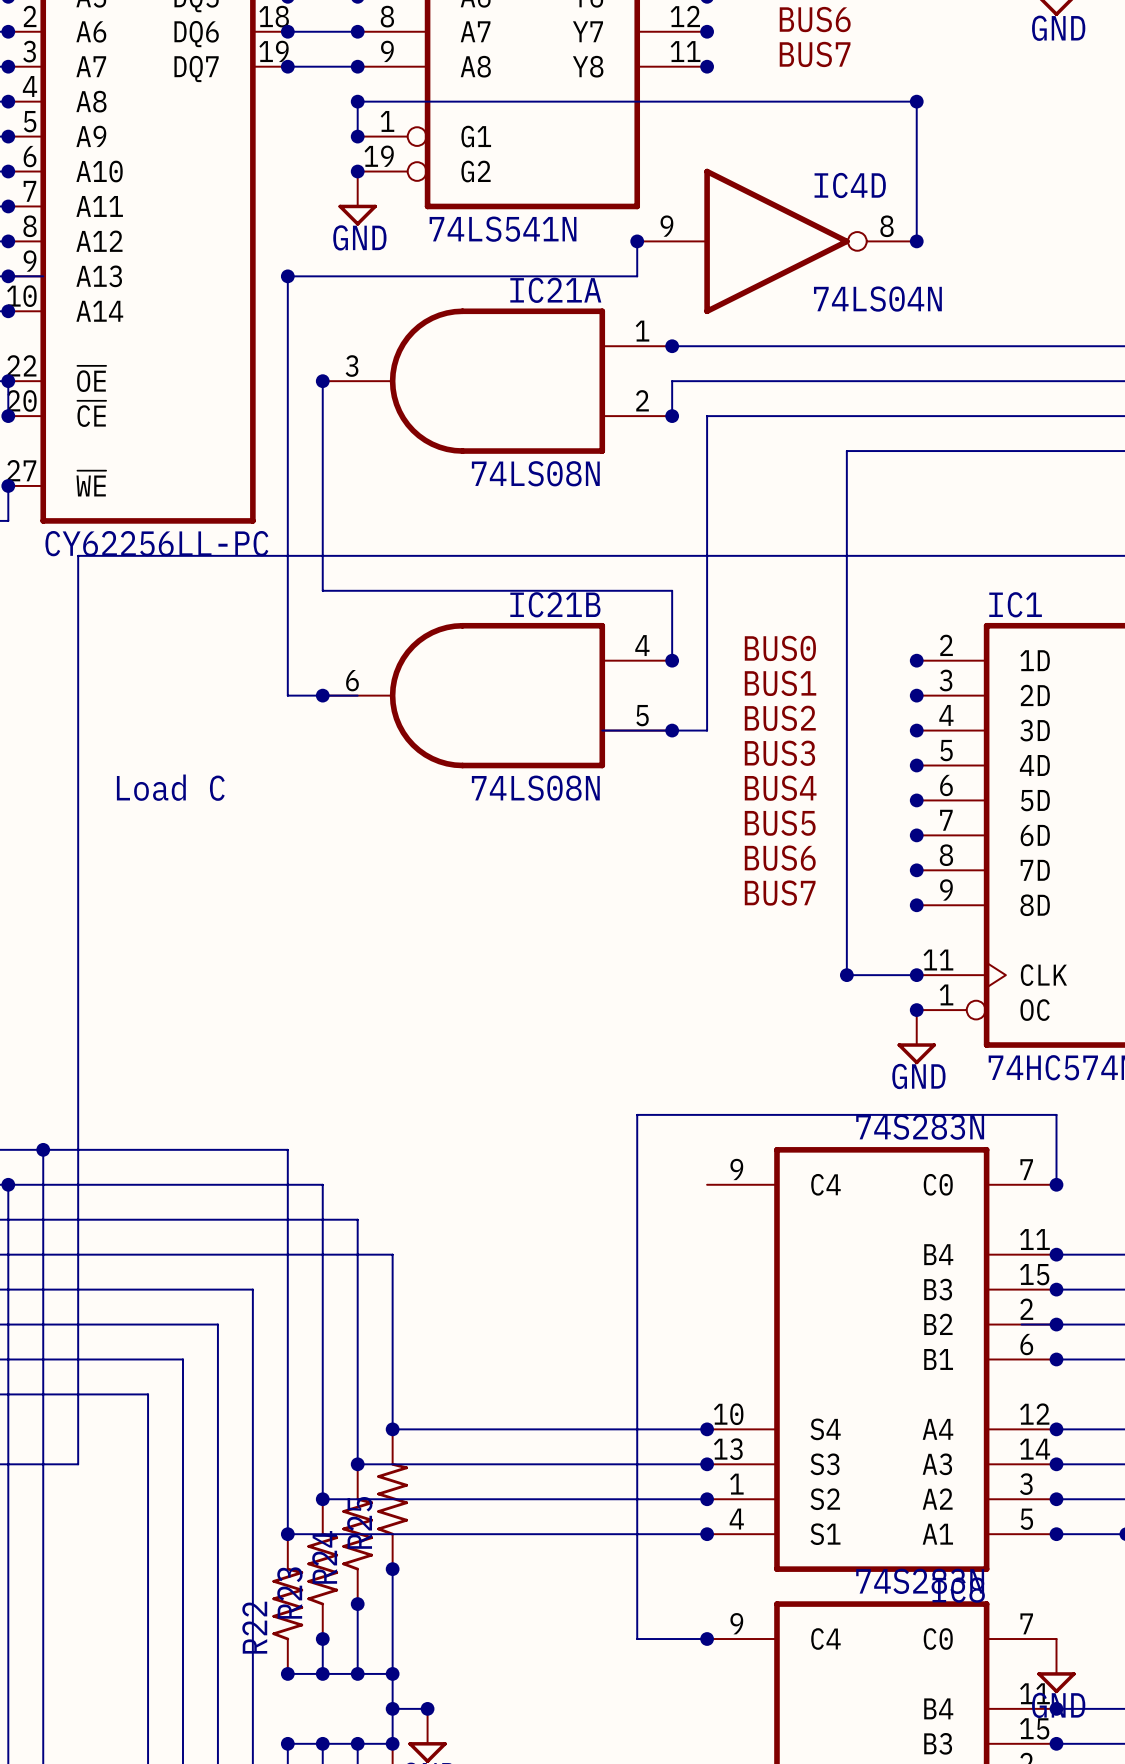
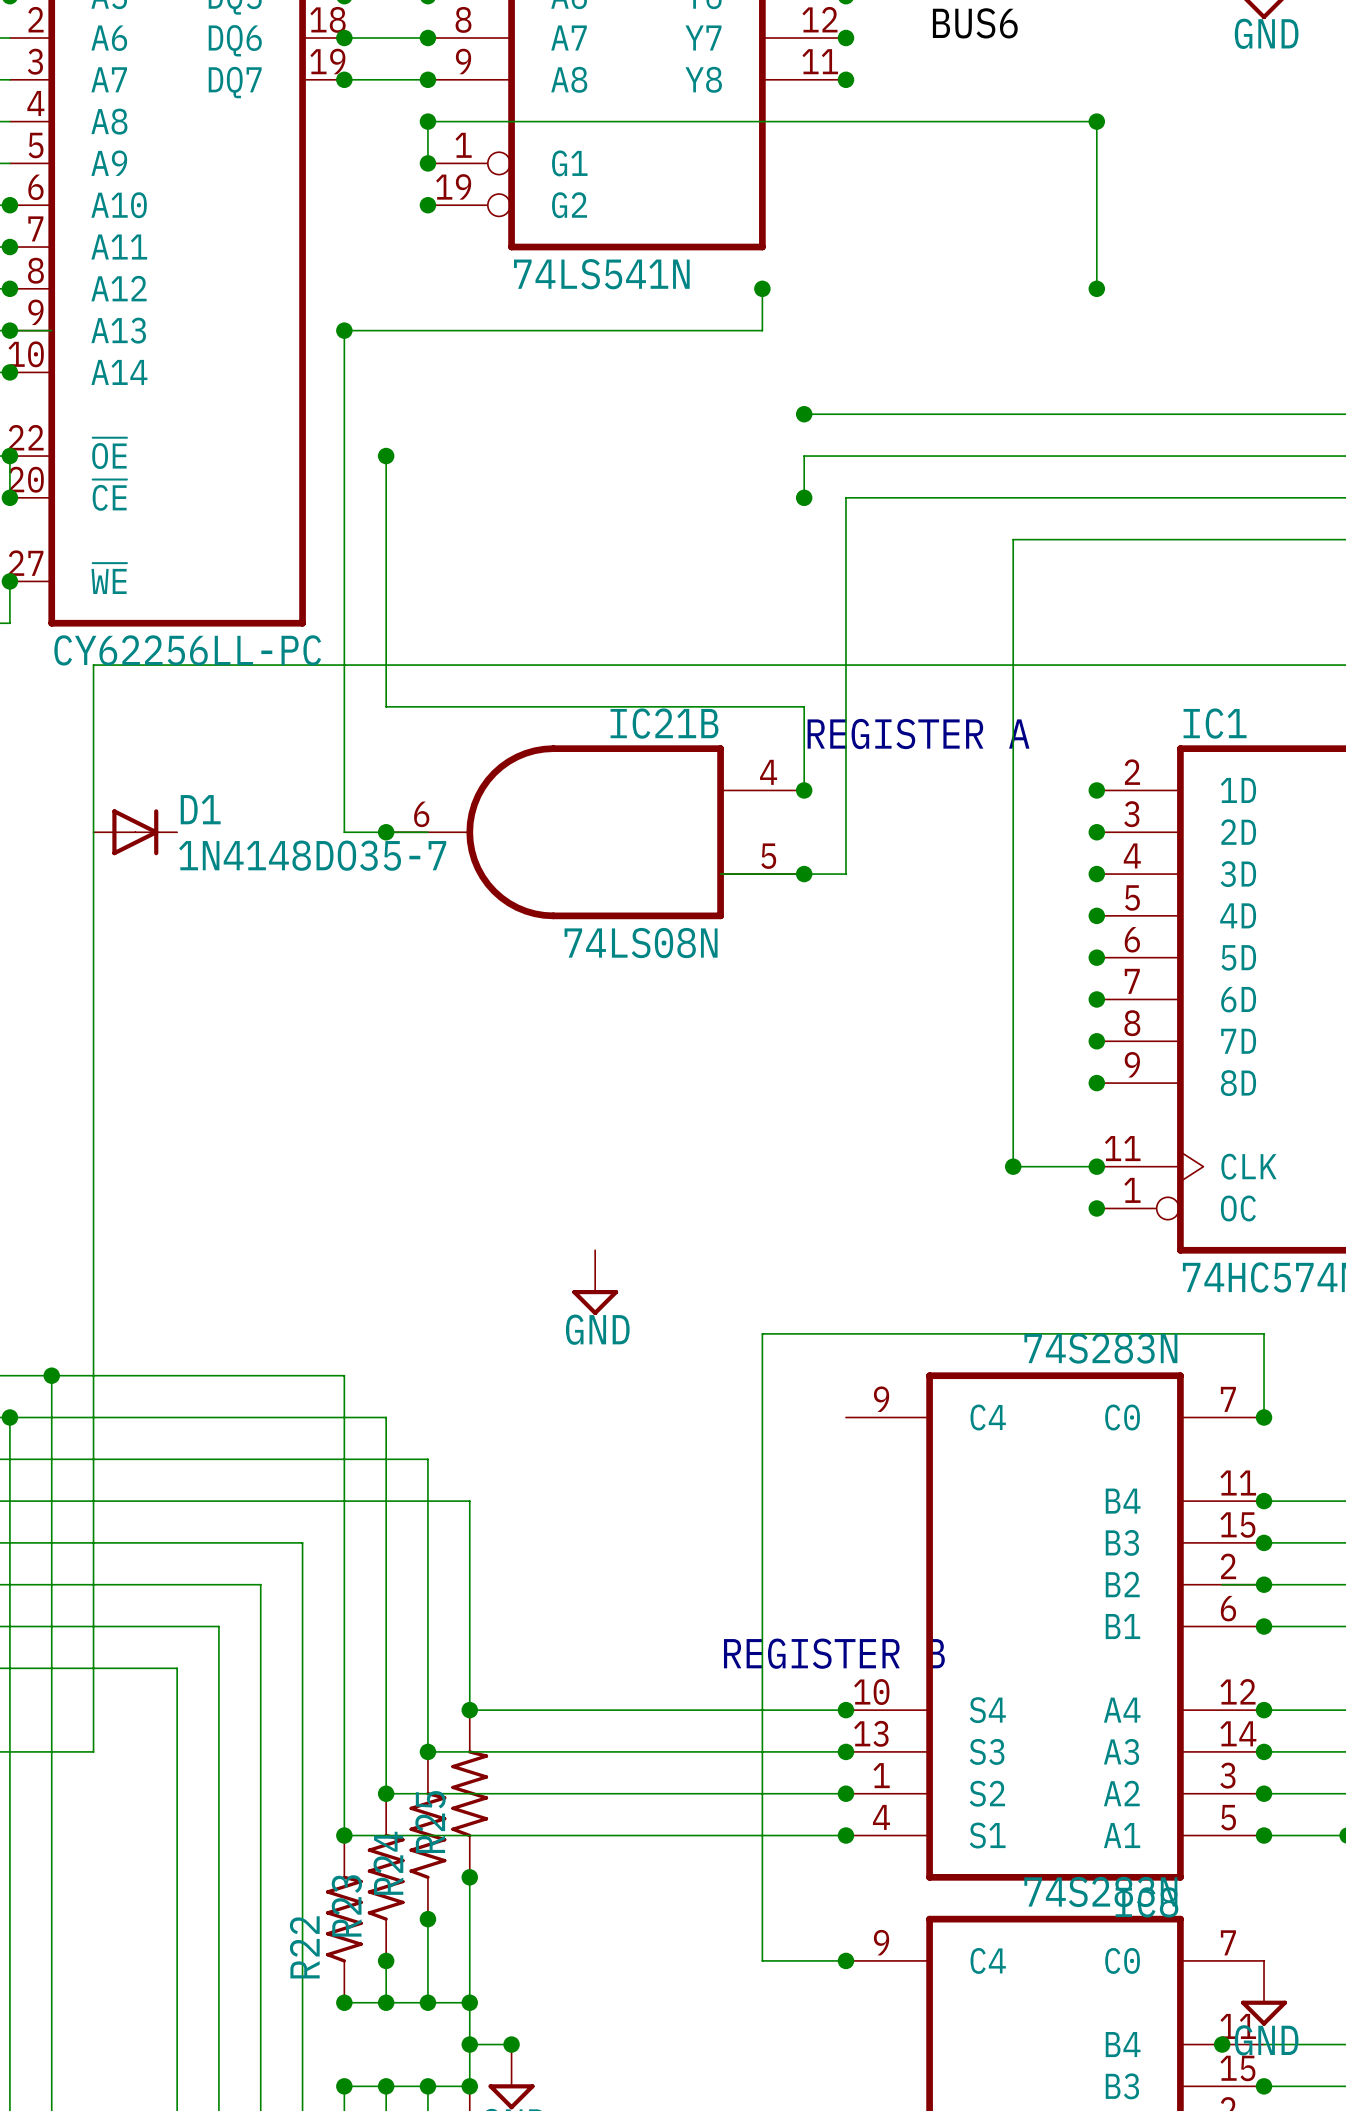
junction: (8, 31) -> none
label: BUS7 (815, 54) -> none
junction: (8, 66) -> none
junction: (8, 101) -> none
junction: (8, 136) -> none
power symbol: GND (357, 198) -> none
IC4D: 74LS04N (776, 241) -> none
IC21A: 74LS08N (497, 381) -> none
text: none -> REGISTER A (918, 734)
label: BUS0 (780, 648) -> none
label: BUS1 (780, 683) -> none
D1: none -> 1N4148DO35-7 (135, 832)
label: BUS2 (780, 718) -> none
label: BUS3 (779, 753) -> none
text: Load C (170, 787) -> none
label: BUS4 (780, 788) -> none
label: BUS5 (780, 823) -> none
label: BUS6 (780, 858) -> none
label: BUS7 (780, 893) -> none
power symbol: GND (916, 1037) -> none
power symbol: none -> GND (595, 1282)
text: none -> REGISTER B (834, 1653)
junction position: (1056, 1708) -> (1222, 2044)

